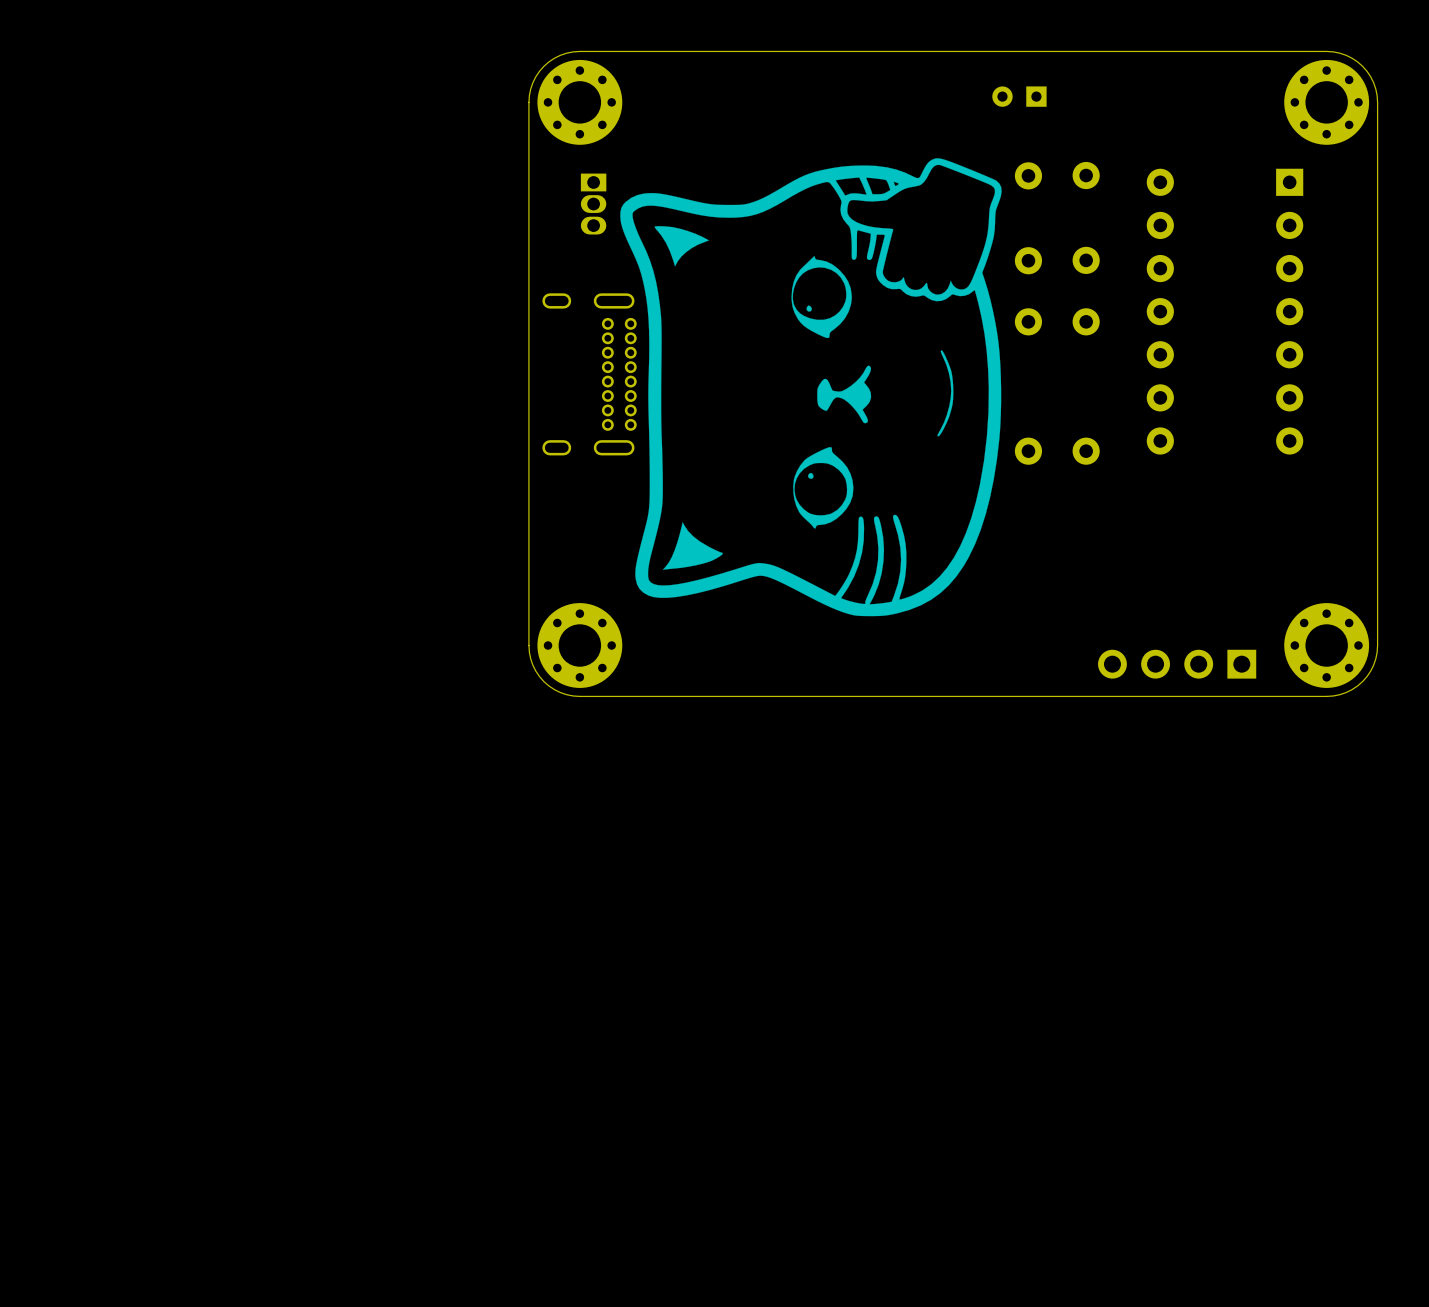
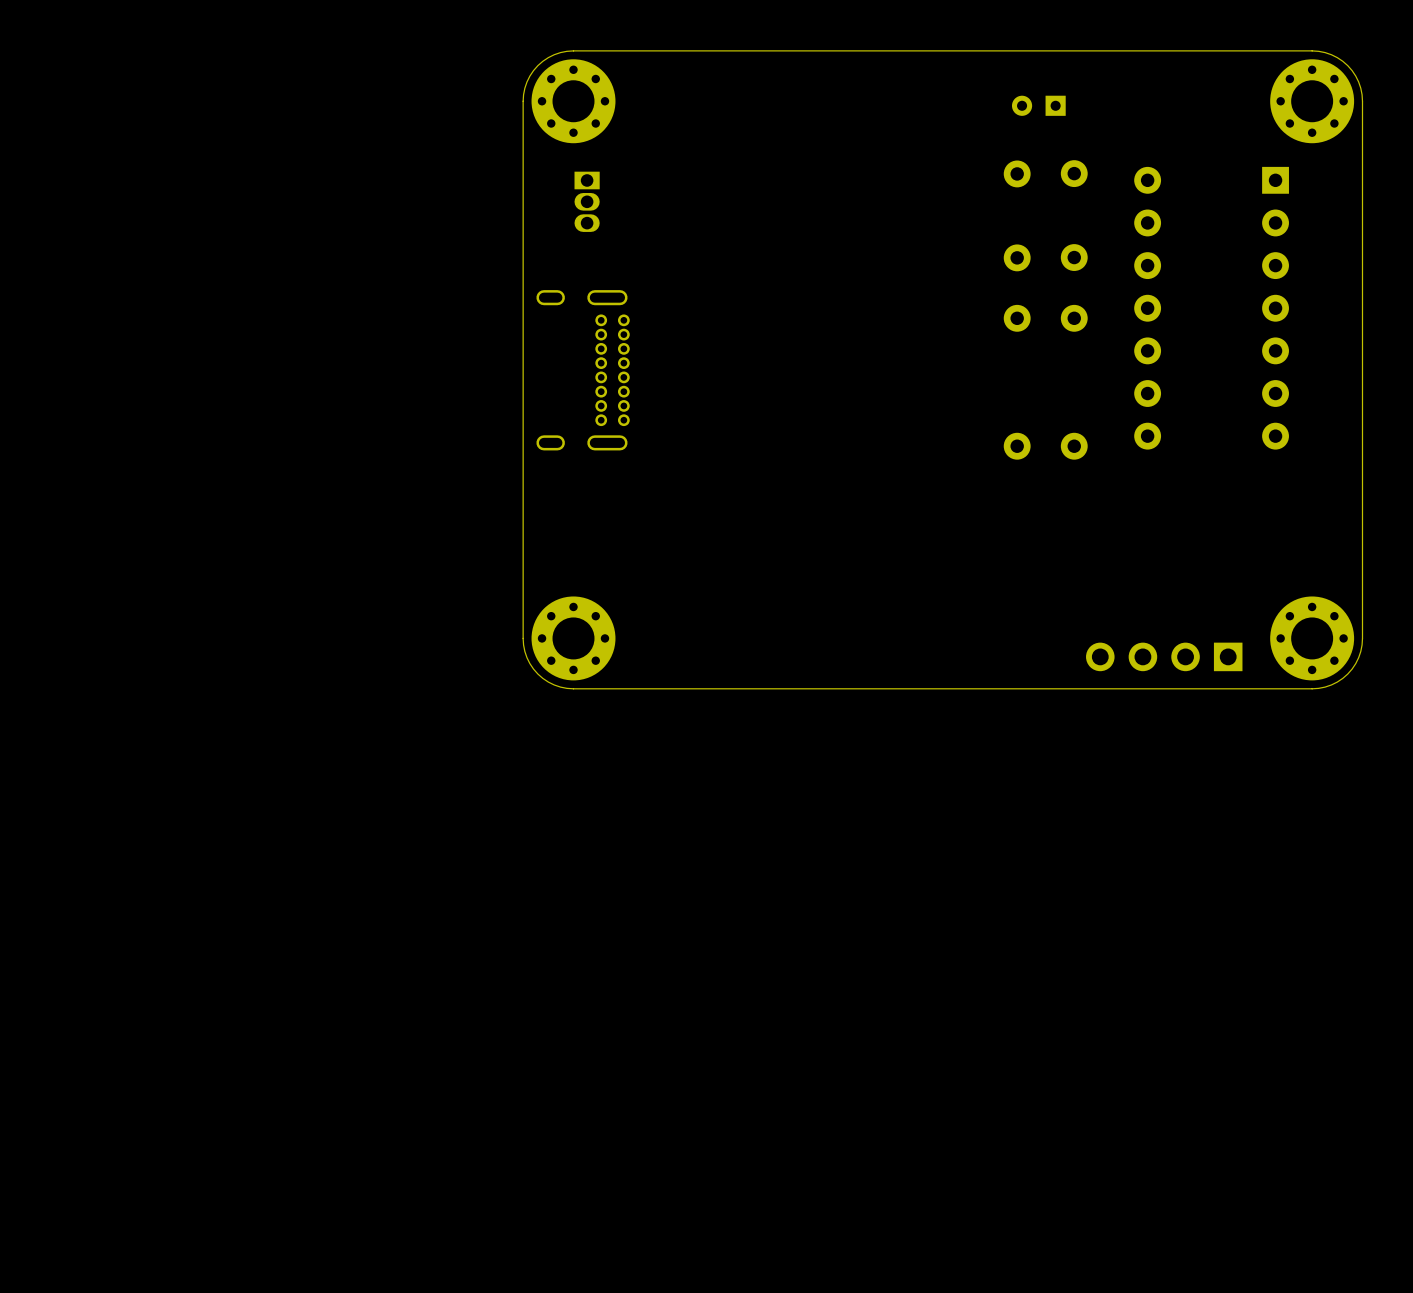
part position: (1019, 96) -> (1038, 105)
drawing: [620, 158, 1002, 617] -> none

